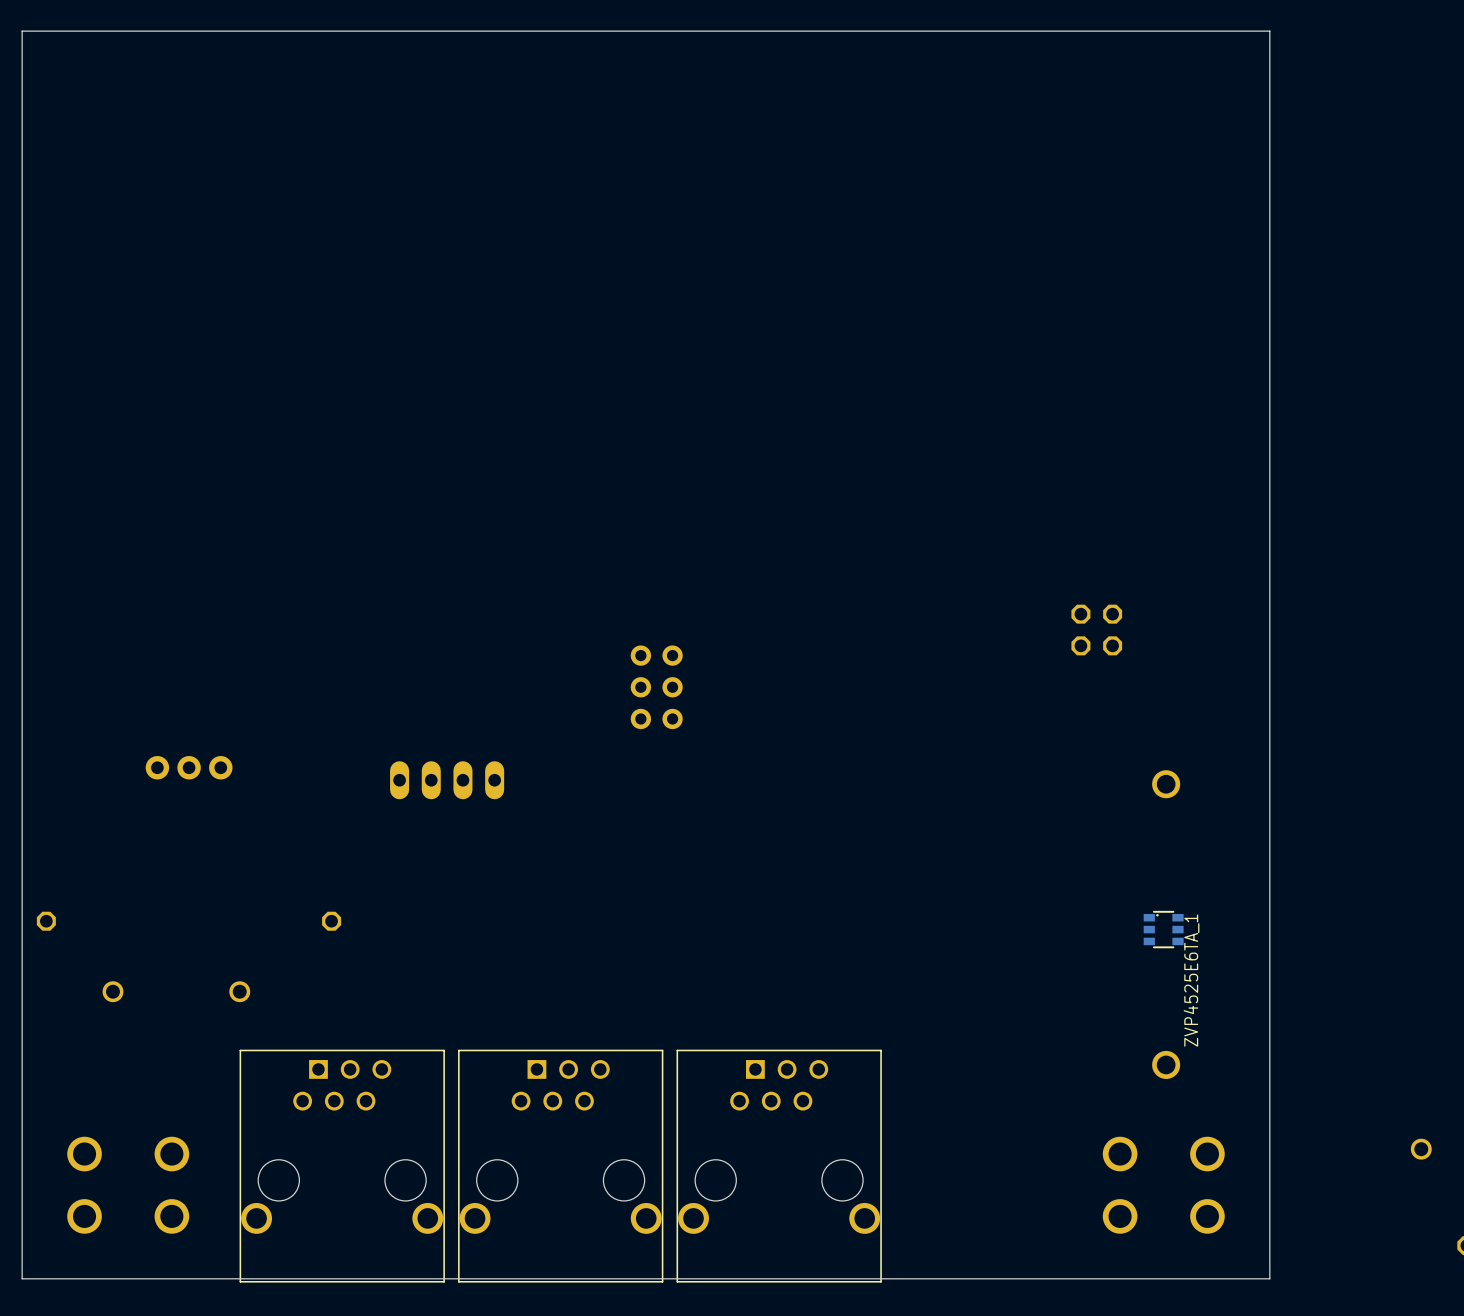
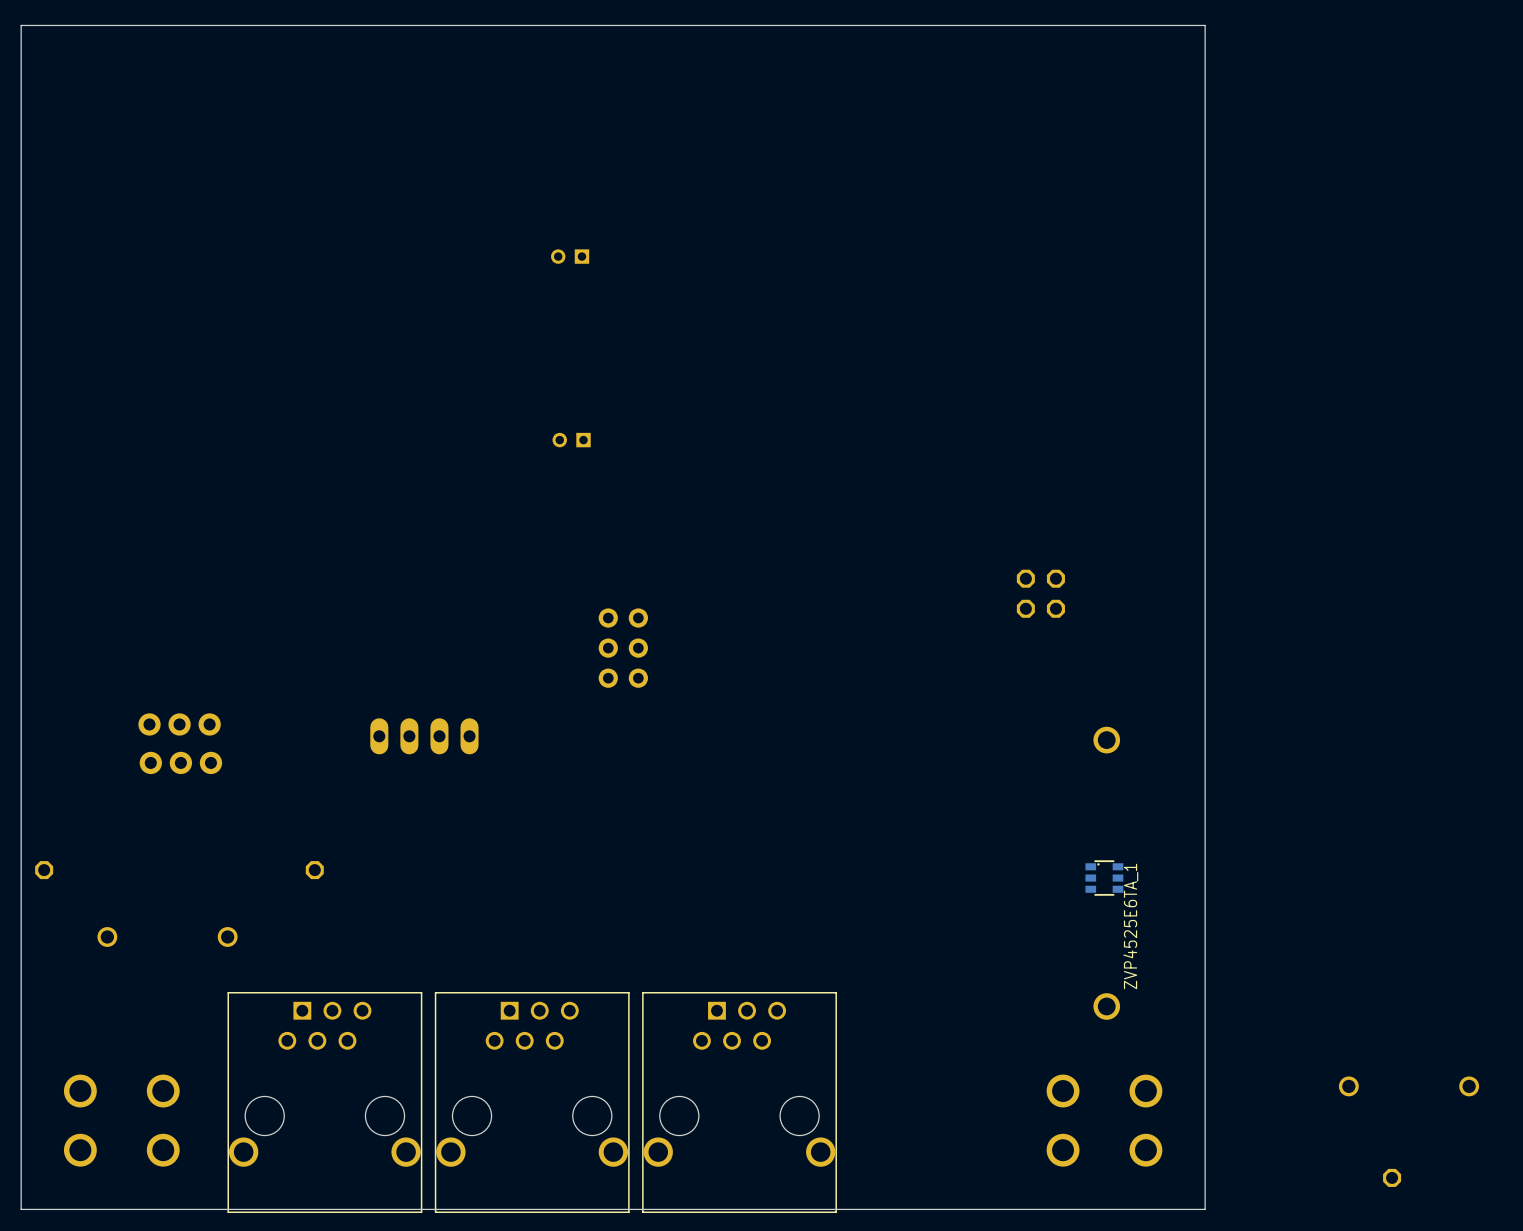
part: none -> (570, 256)
part: none -> (571, 440)
part: none -> (180, 762)

